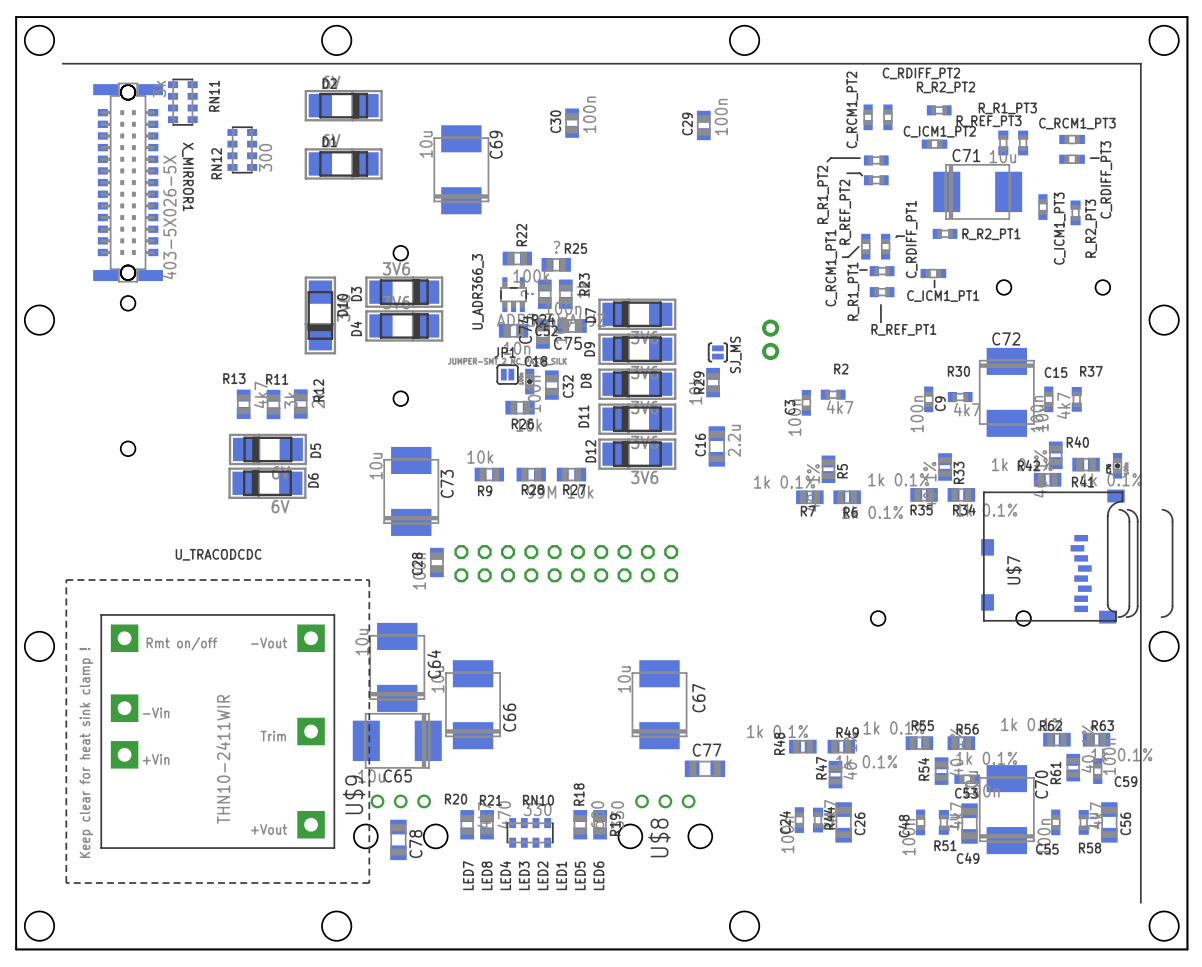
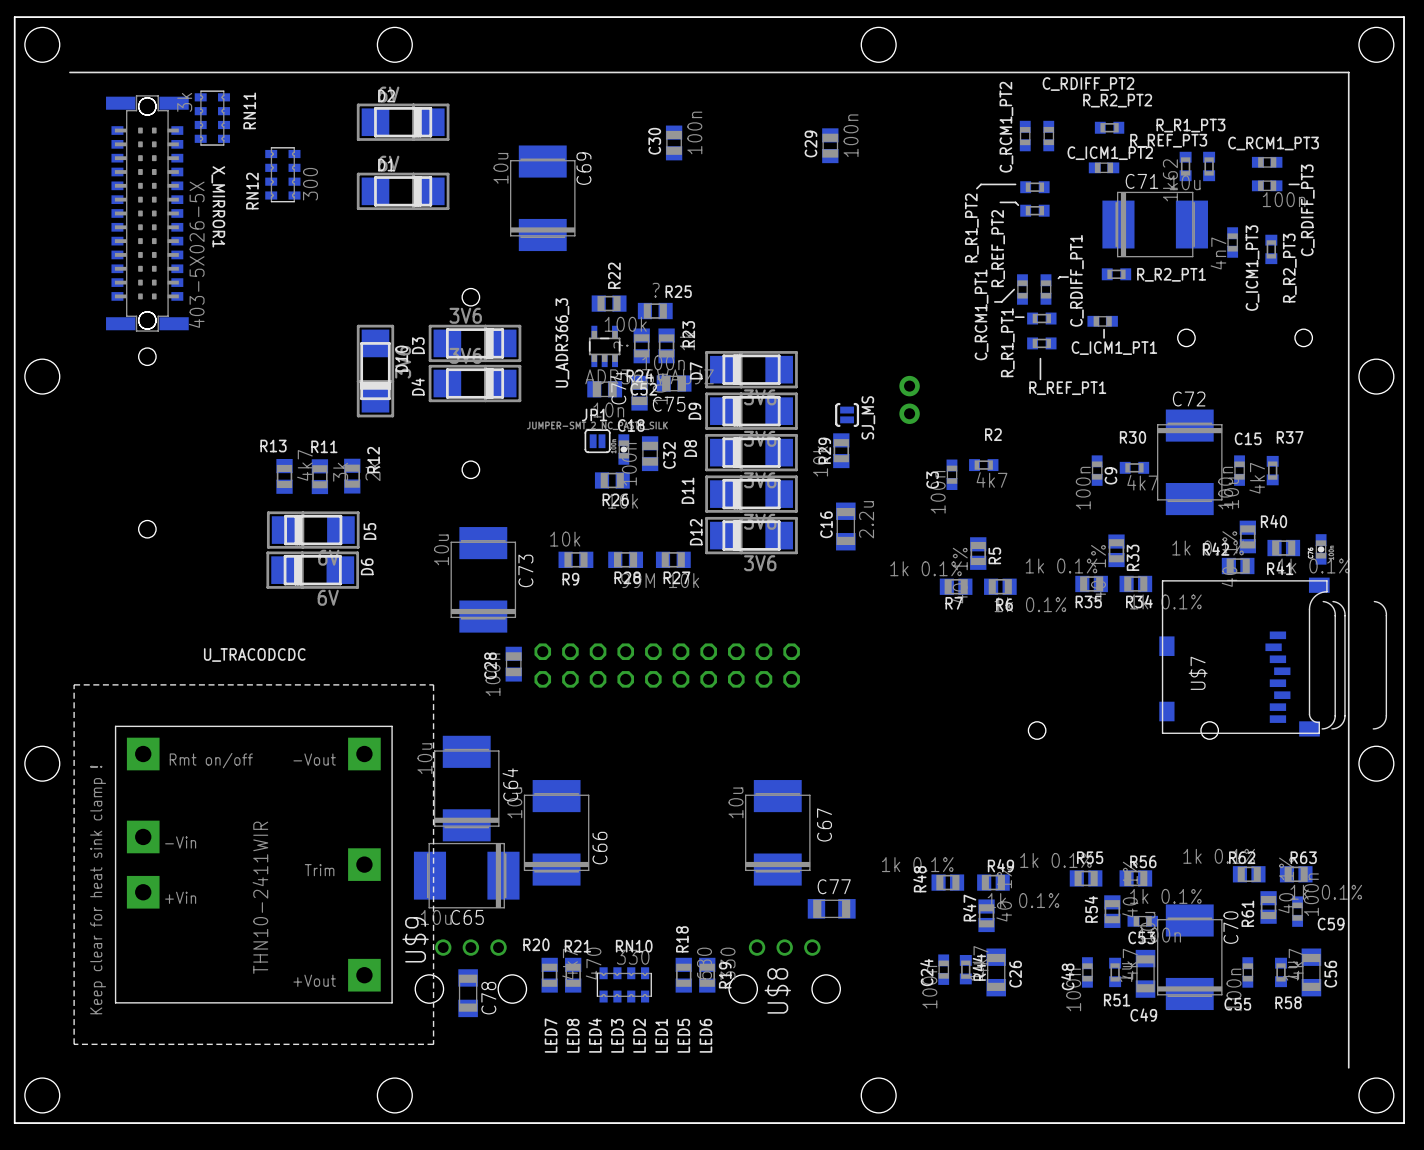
R_REF_PT3 value: none -> 1k62 (1170, 180)
C_RDIFF_PT3 value: none -> 100n (1284, 199)
C_ICM1_PT3 value: none -> 4n7 (1218, 253)

